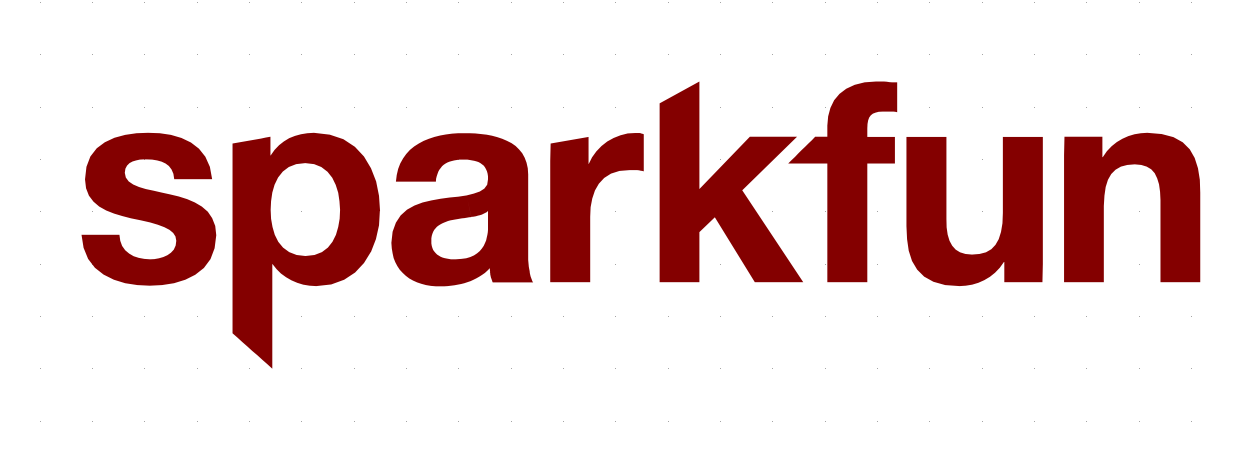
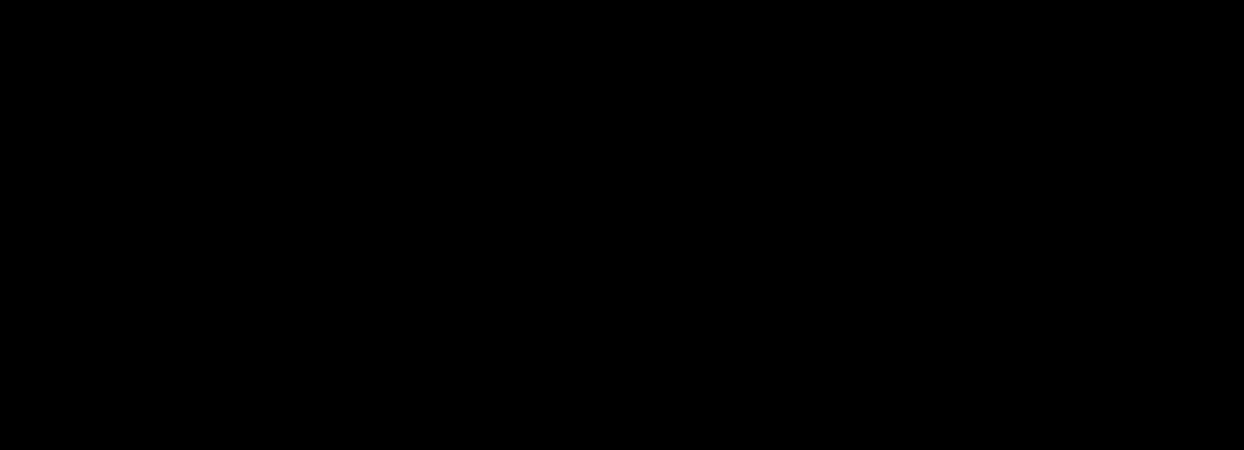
part: (640, 225) -> none

